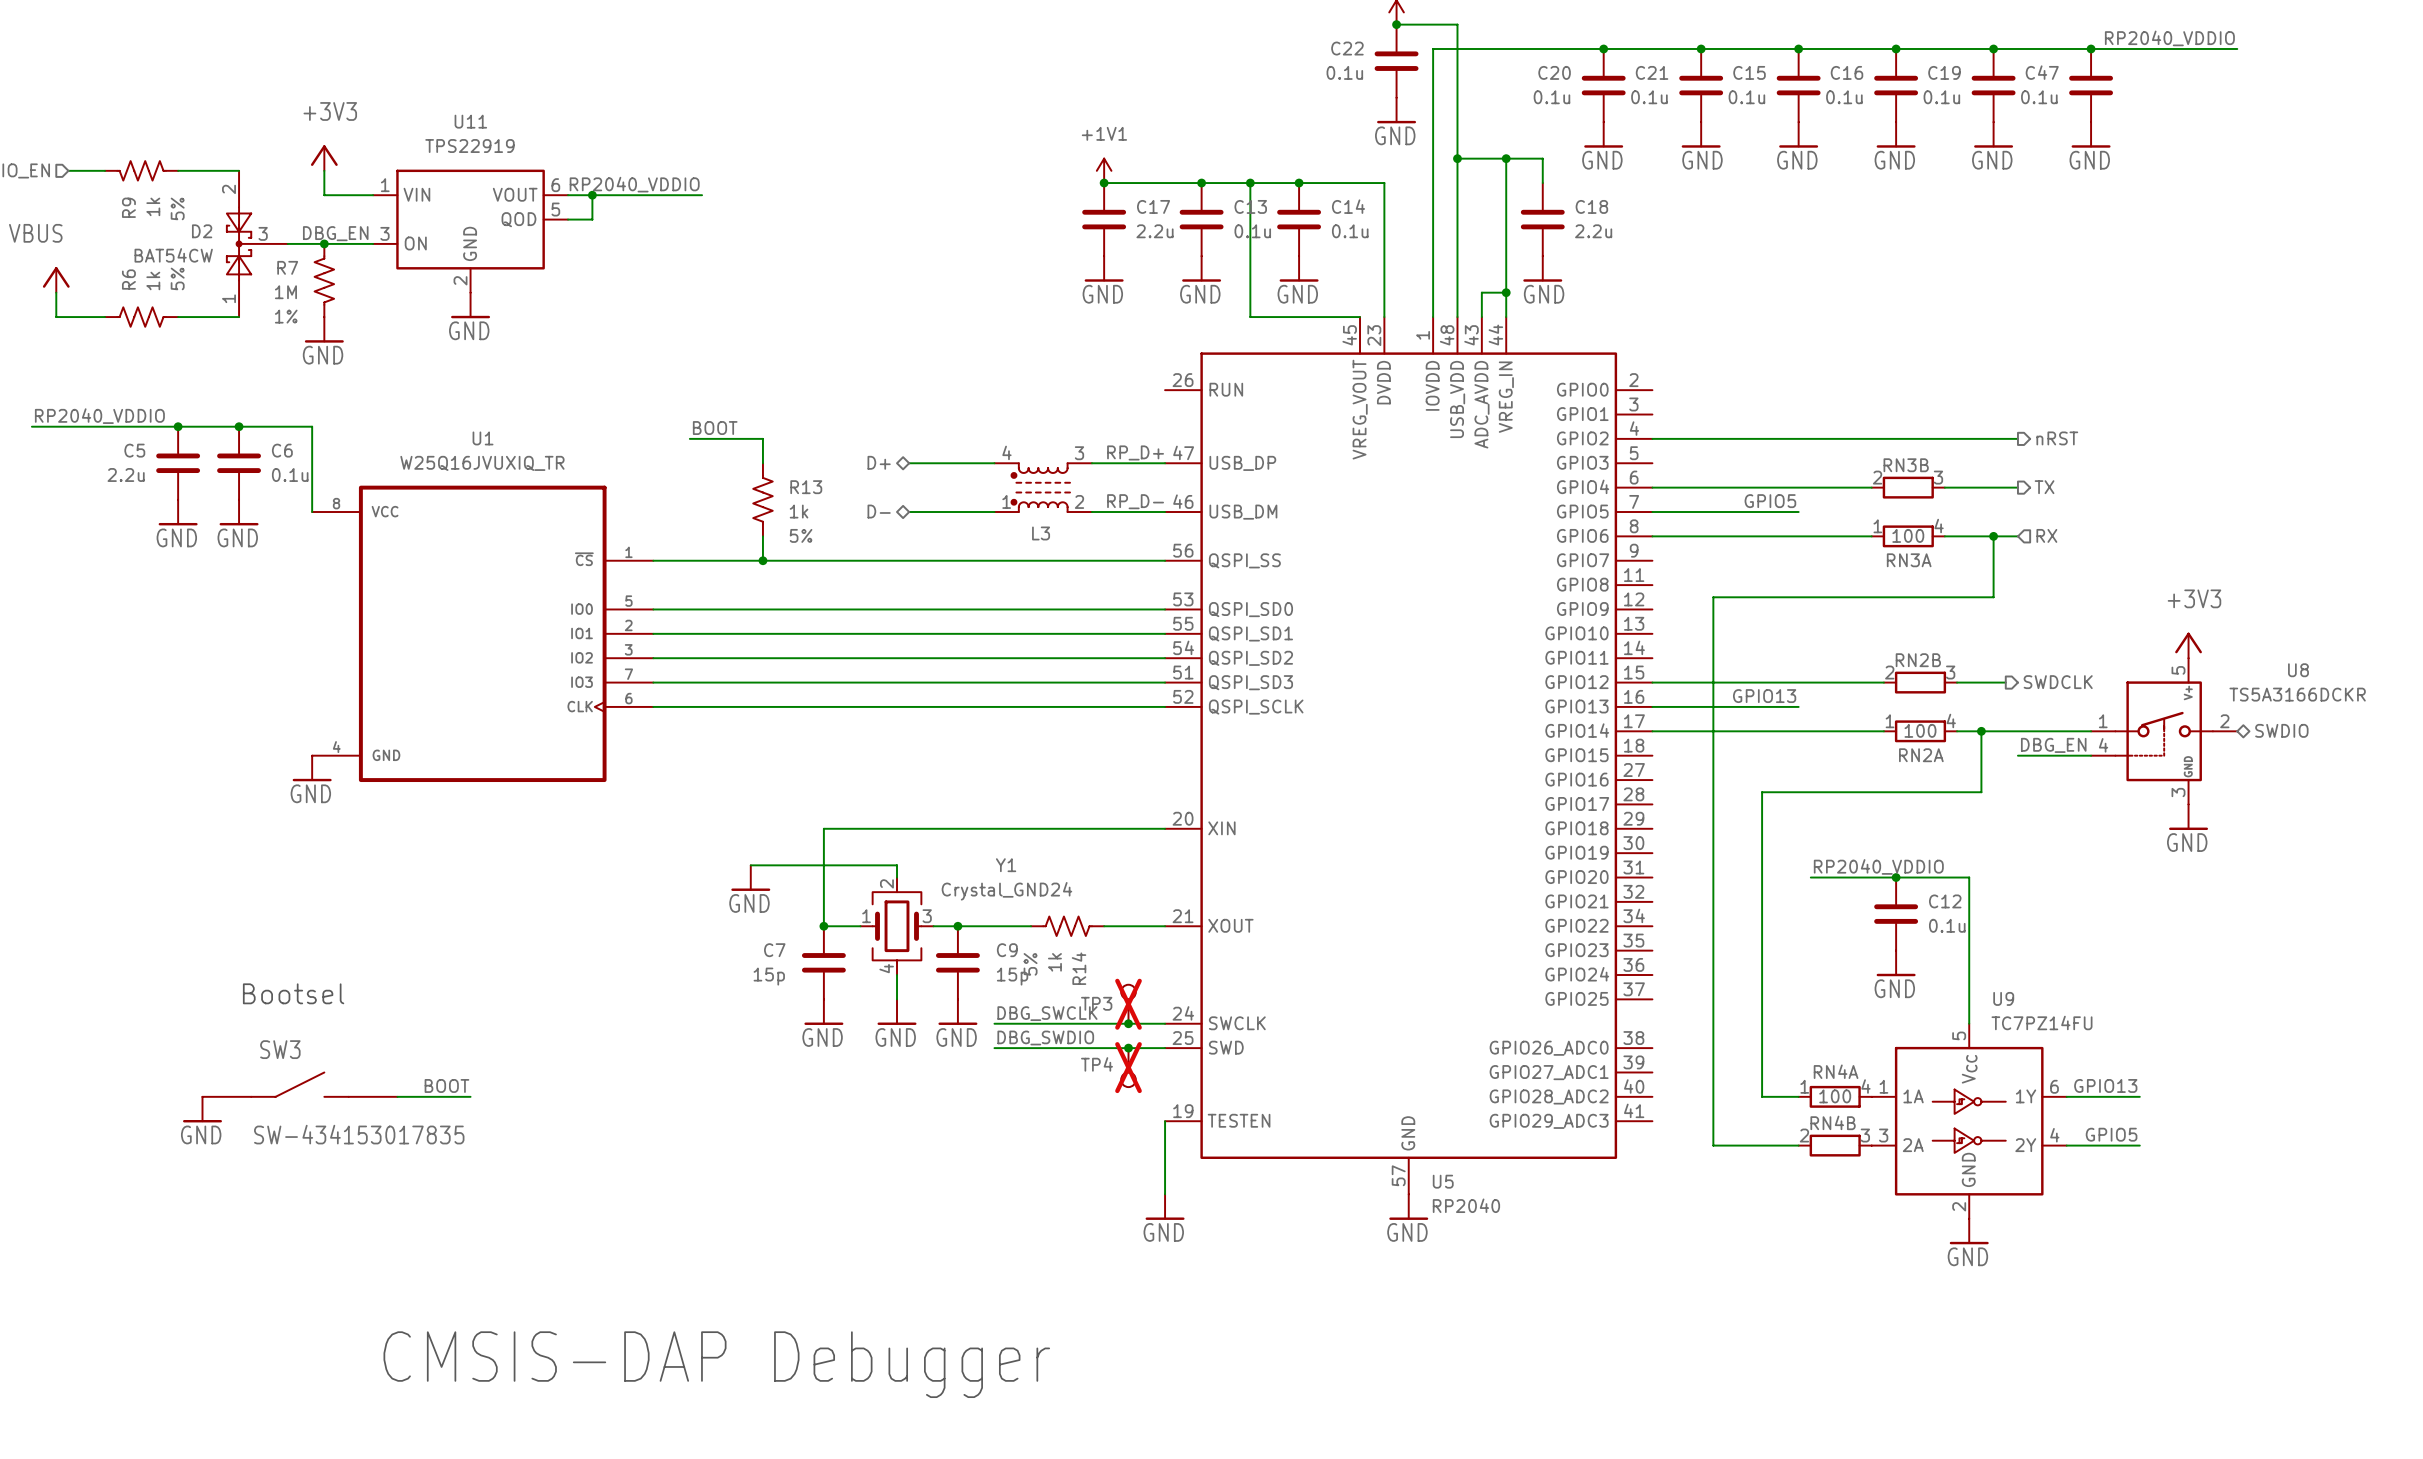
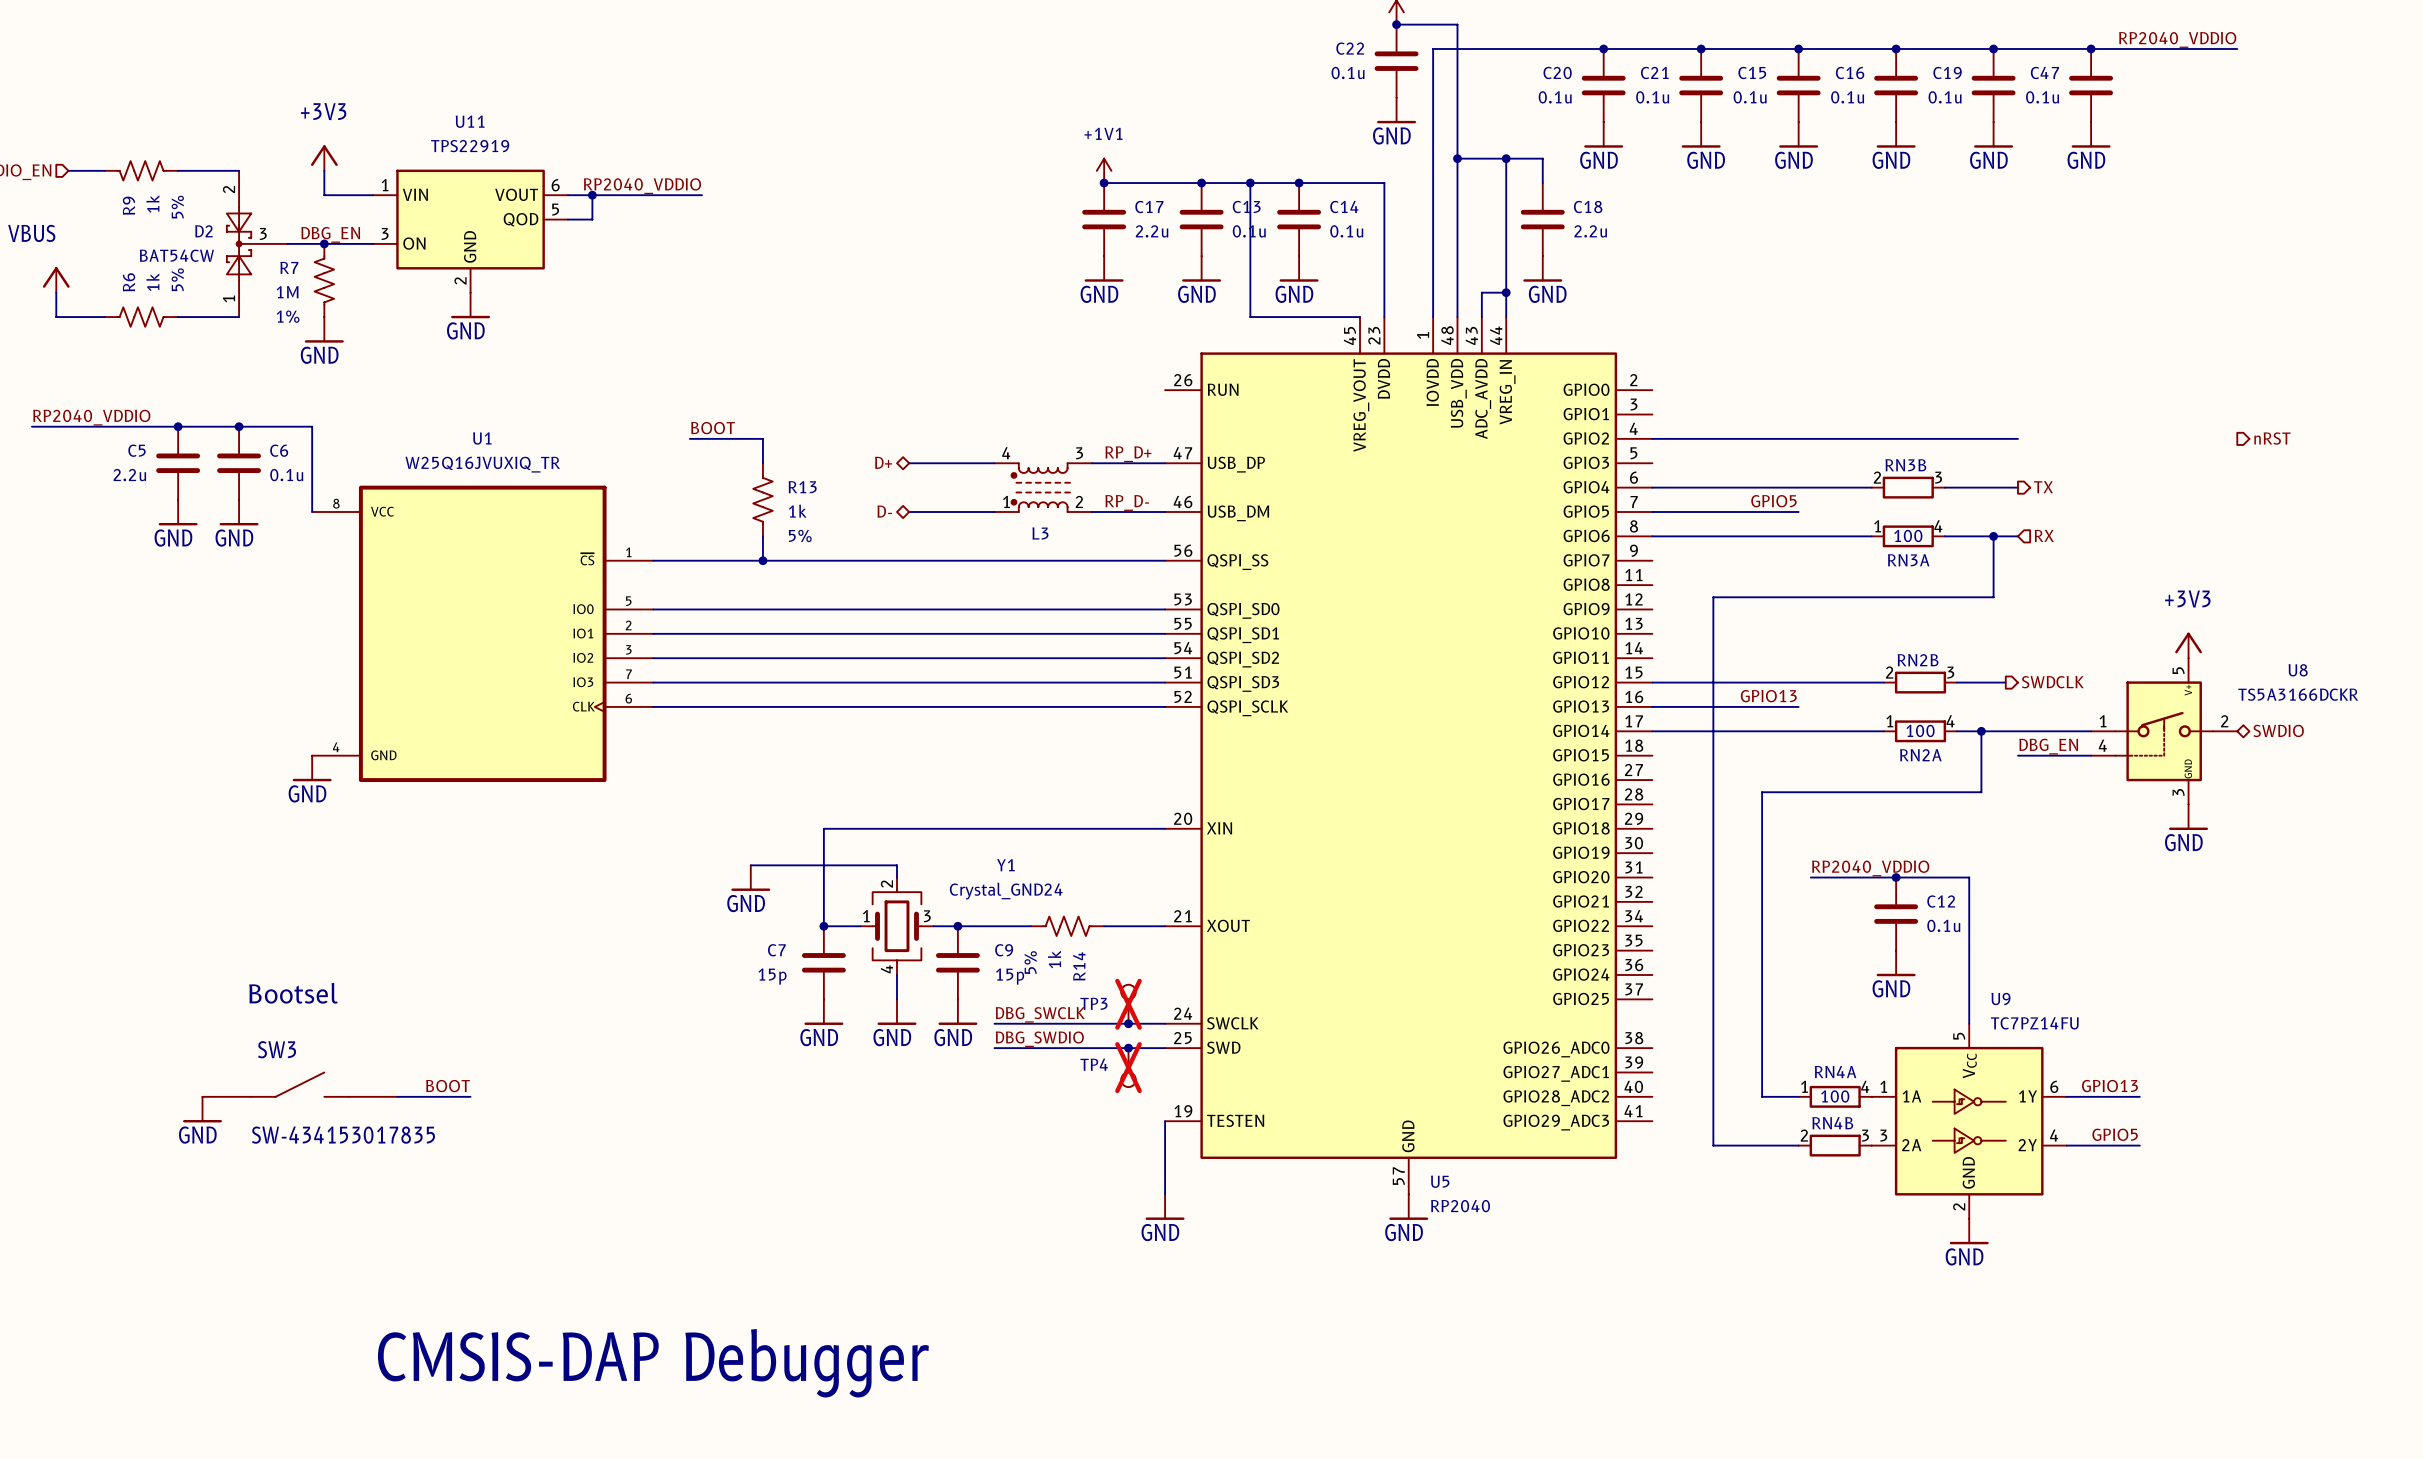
hierarchical label position: nRST (2057, 438) -> nRST (2272, 438)

